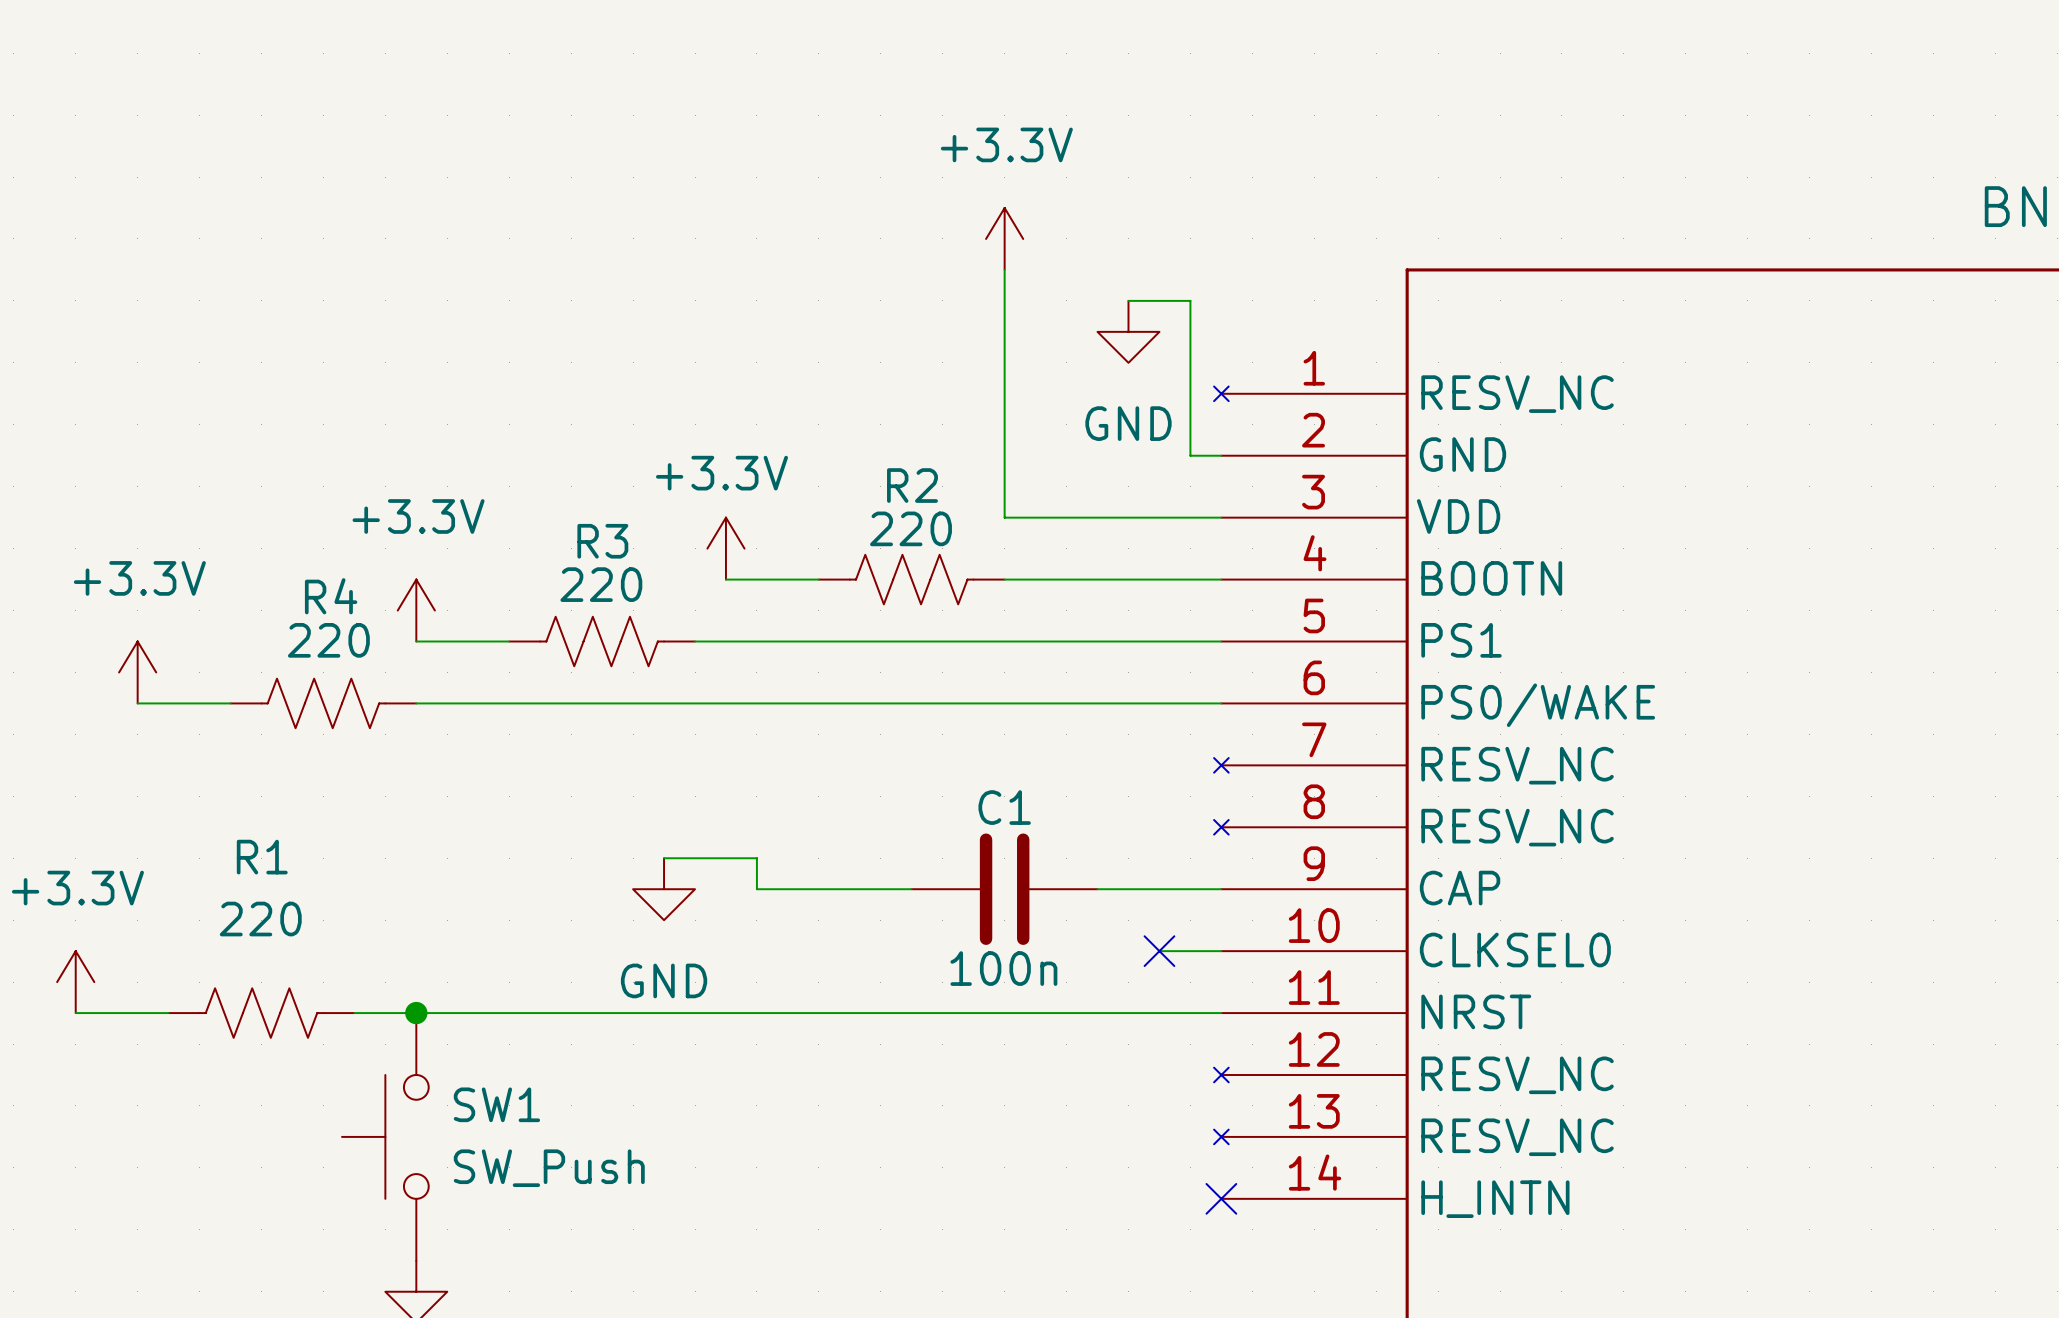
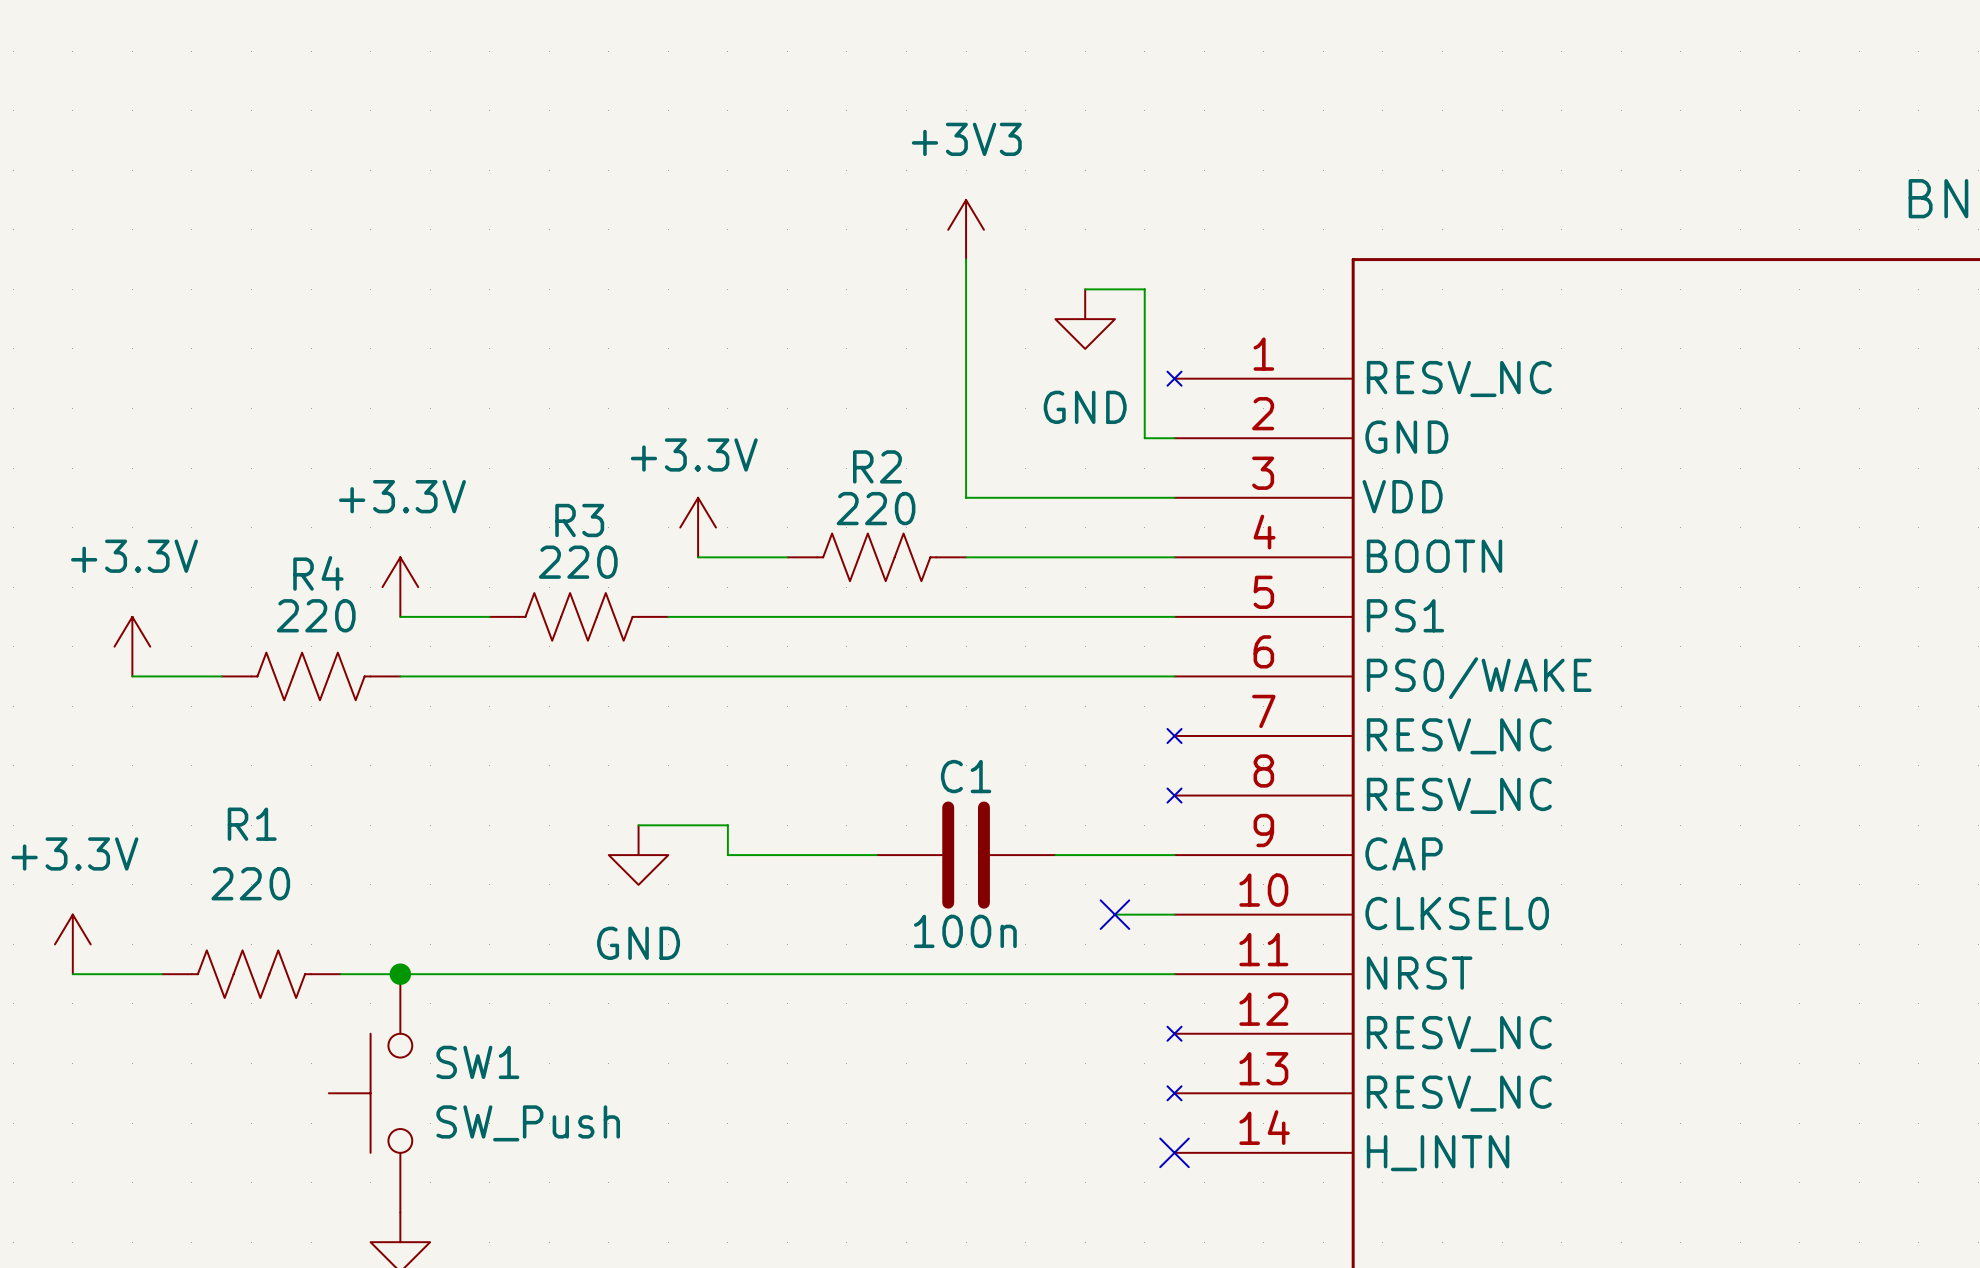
power symbol: +3.3V (1004, 238) -> +3V3 (966, 229)

